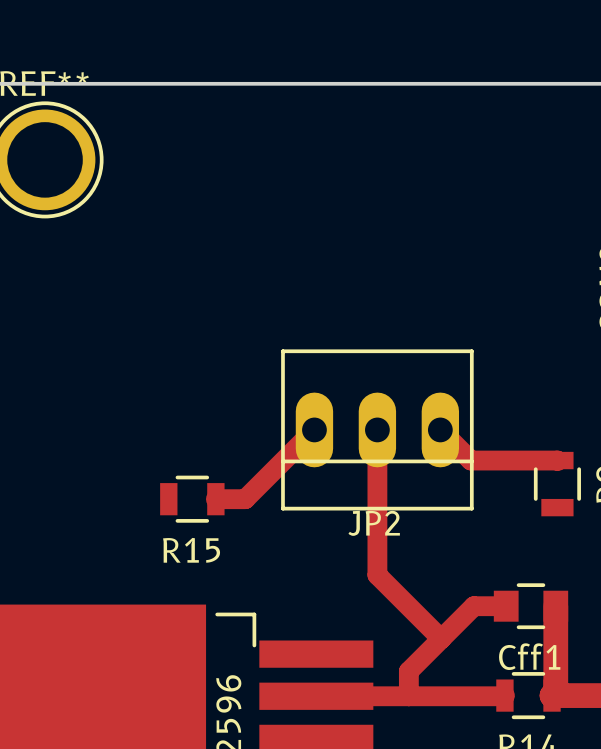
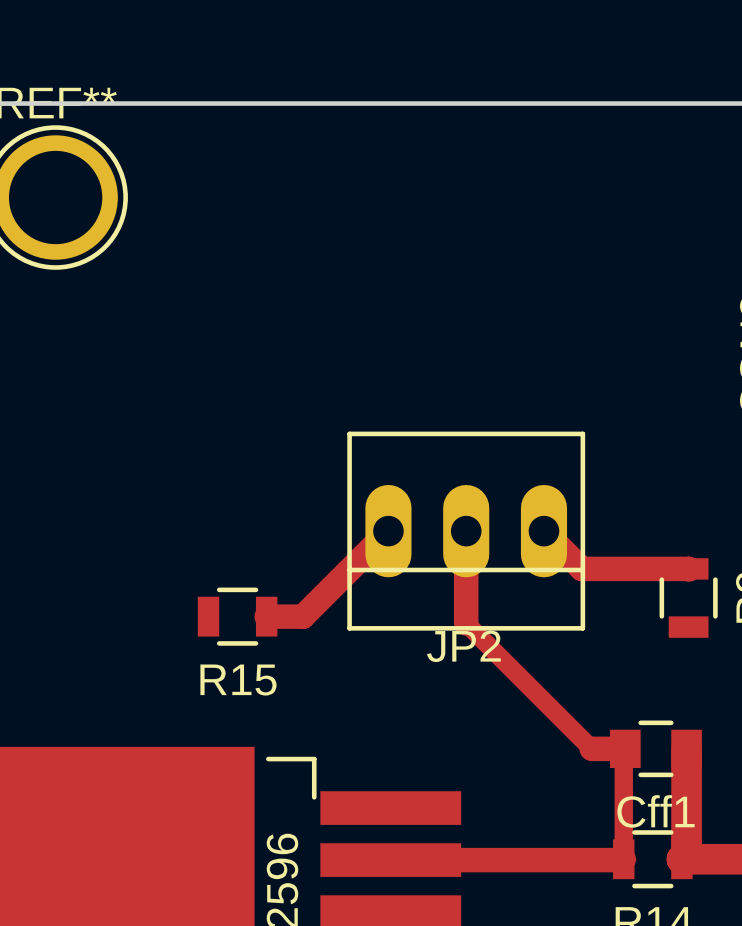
top track: (377, 504) (377, 575) (441, 638) -> (466, 623) (591, 748)
top track: (478, 606) (473, 606) (408, 671) (408, 696) -> none
top track: none -> (625, 748) (623, 750) (622, 860)

